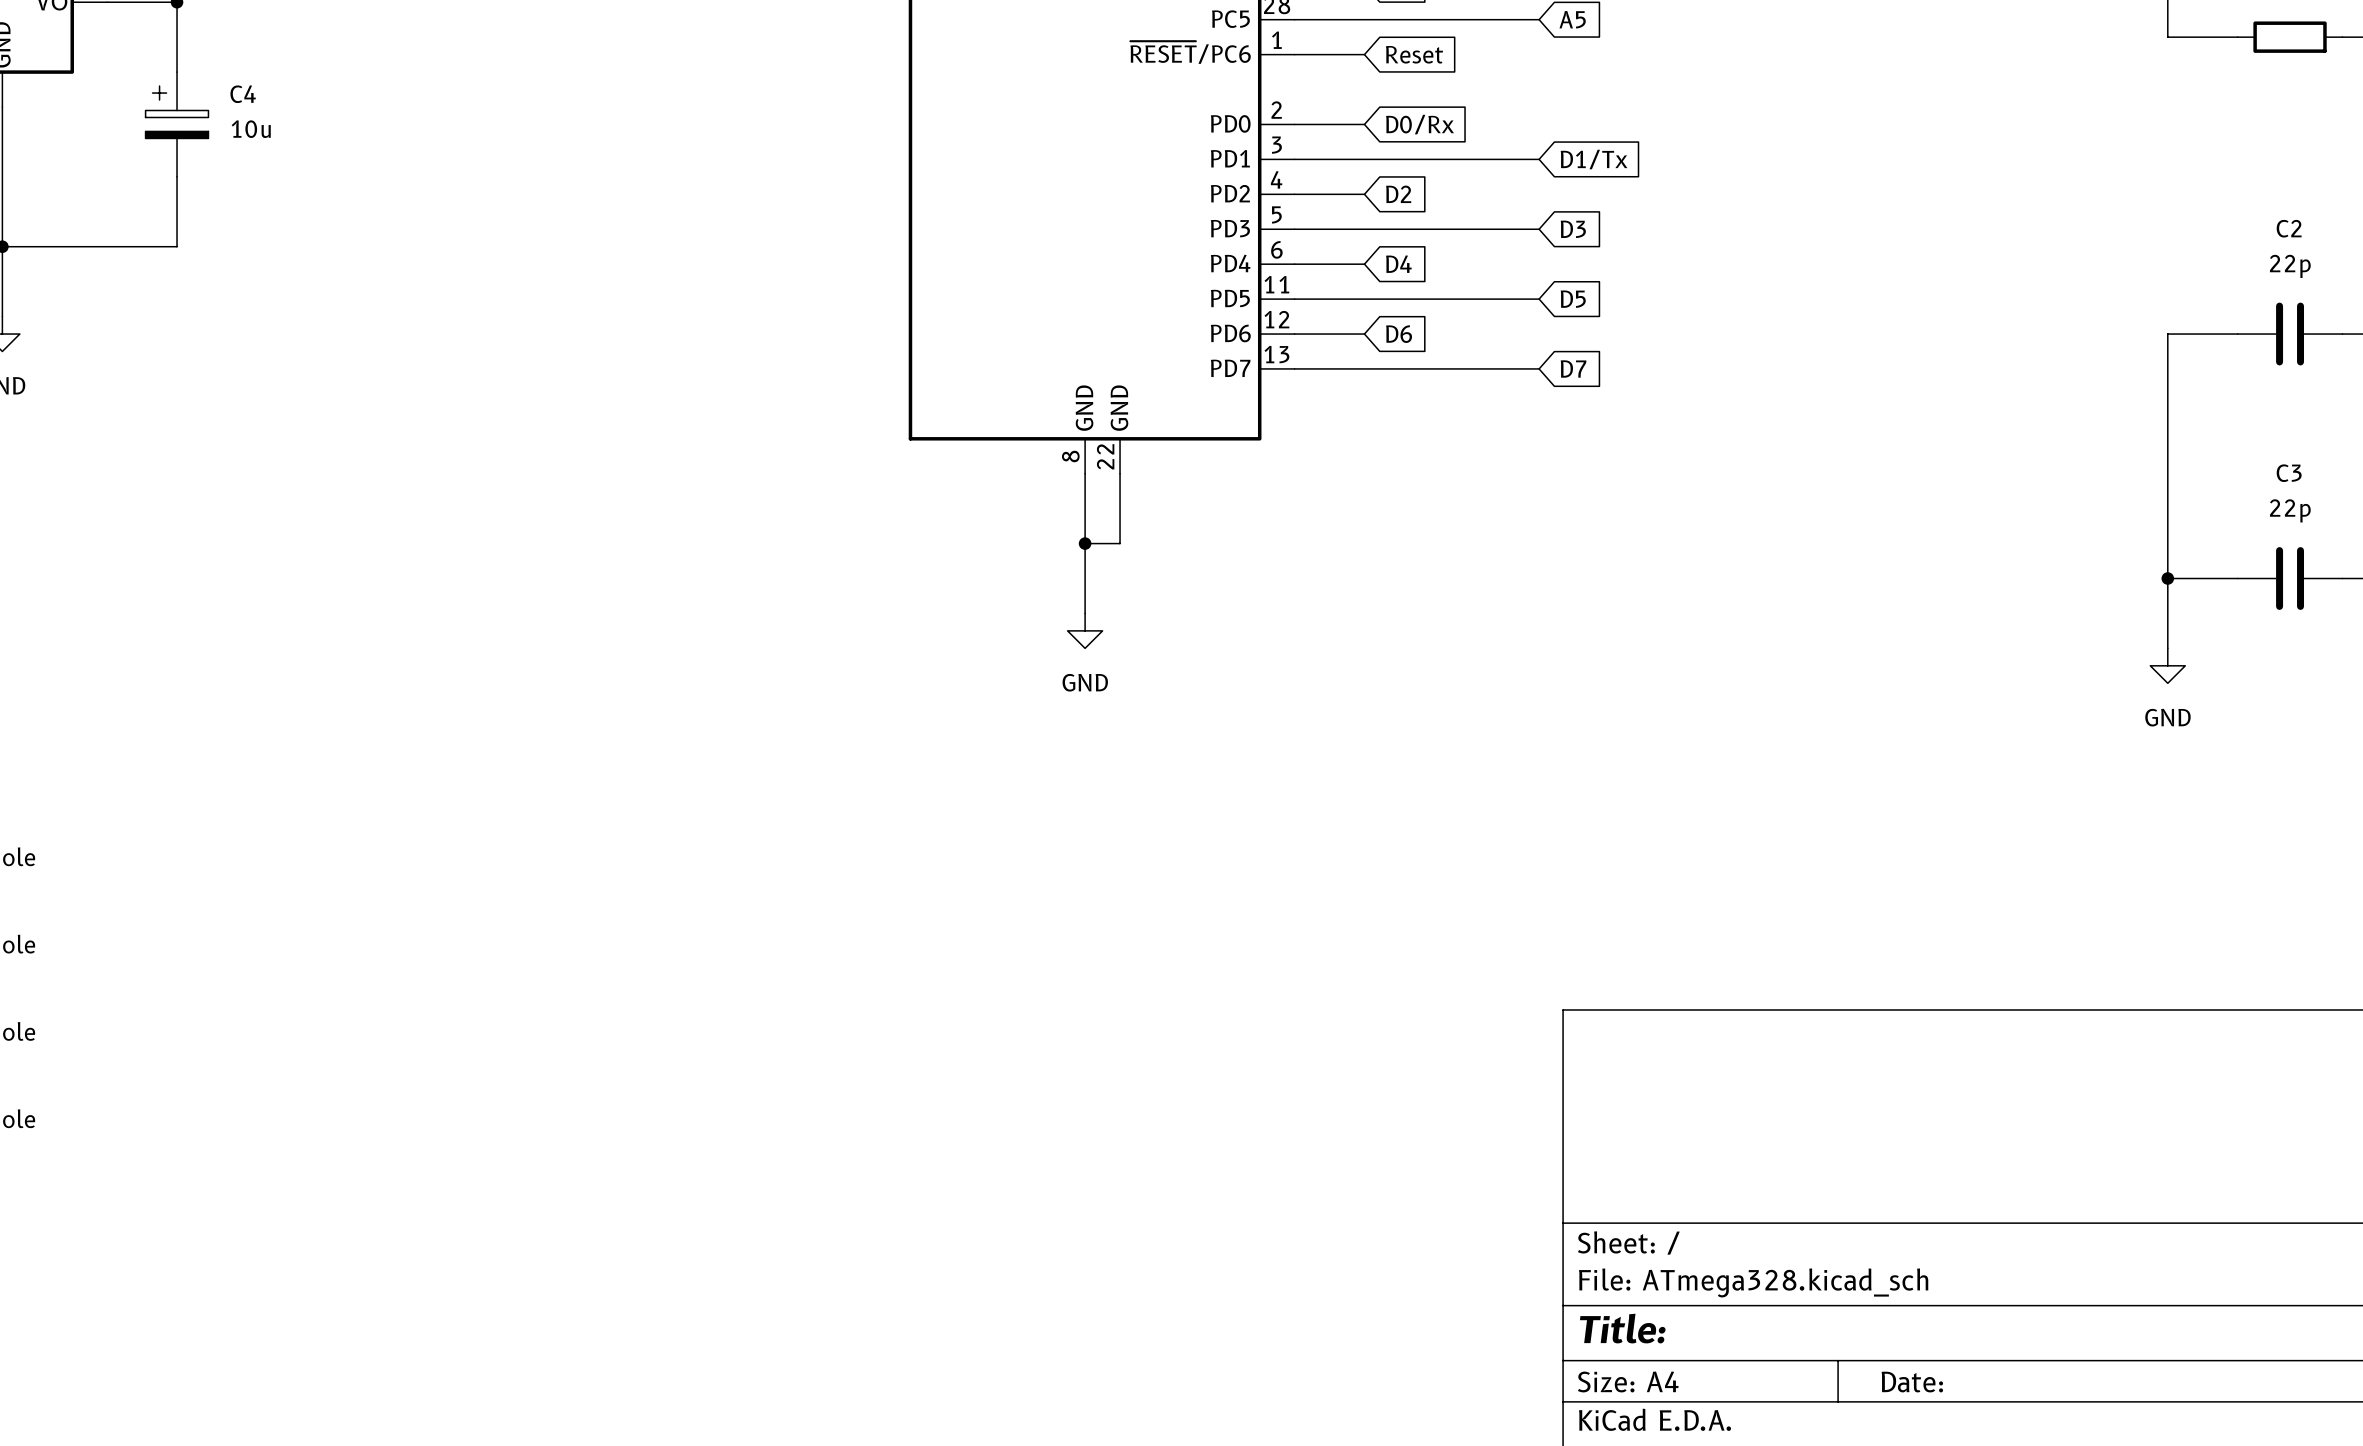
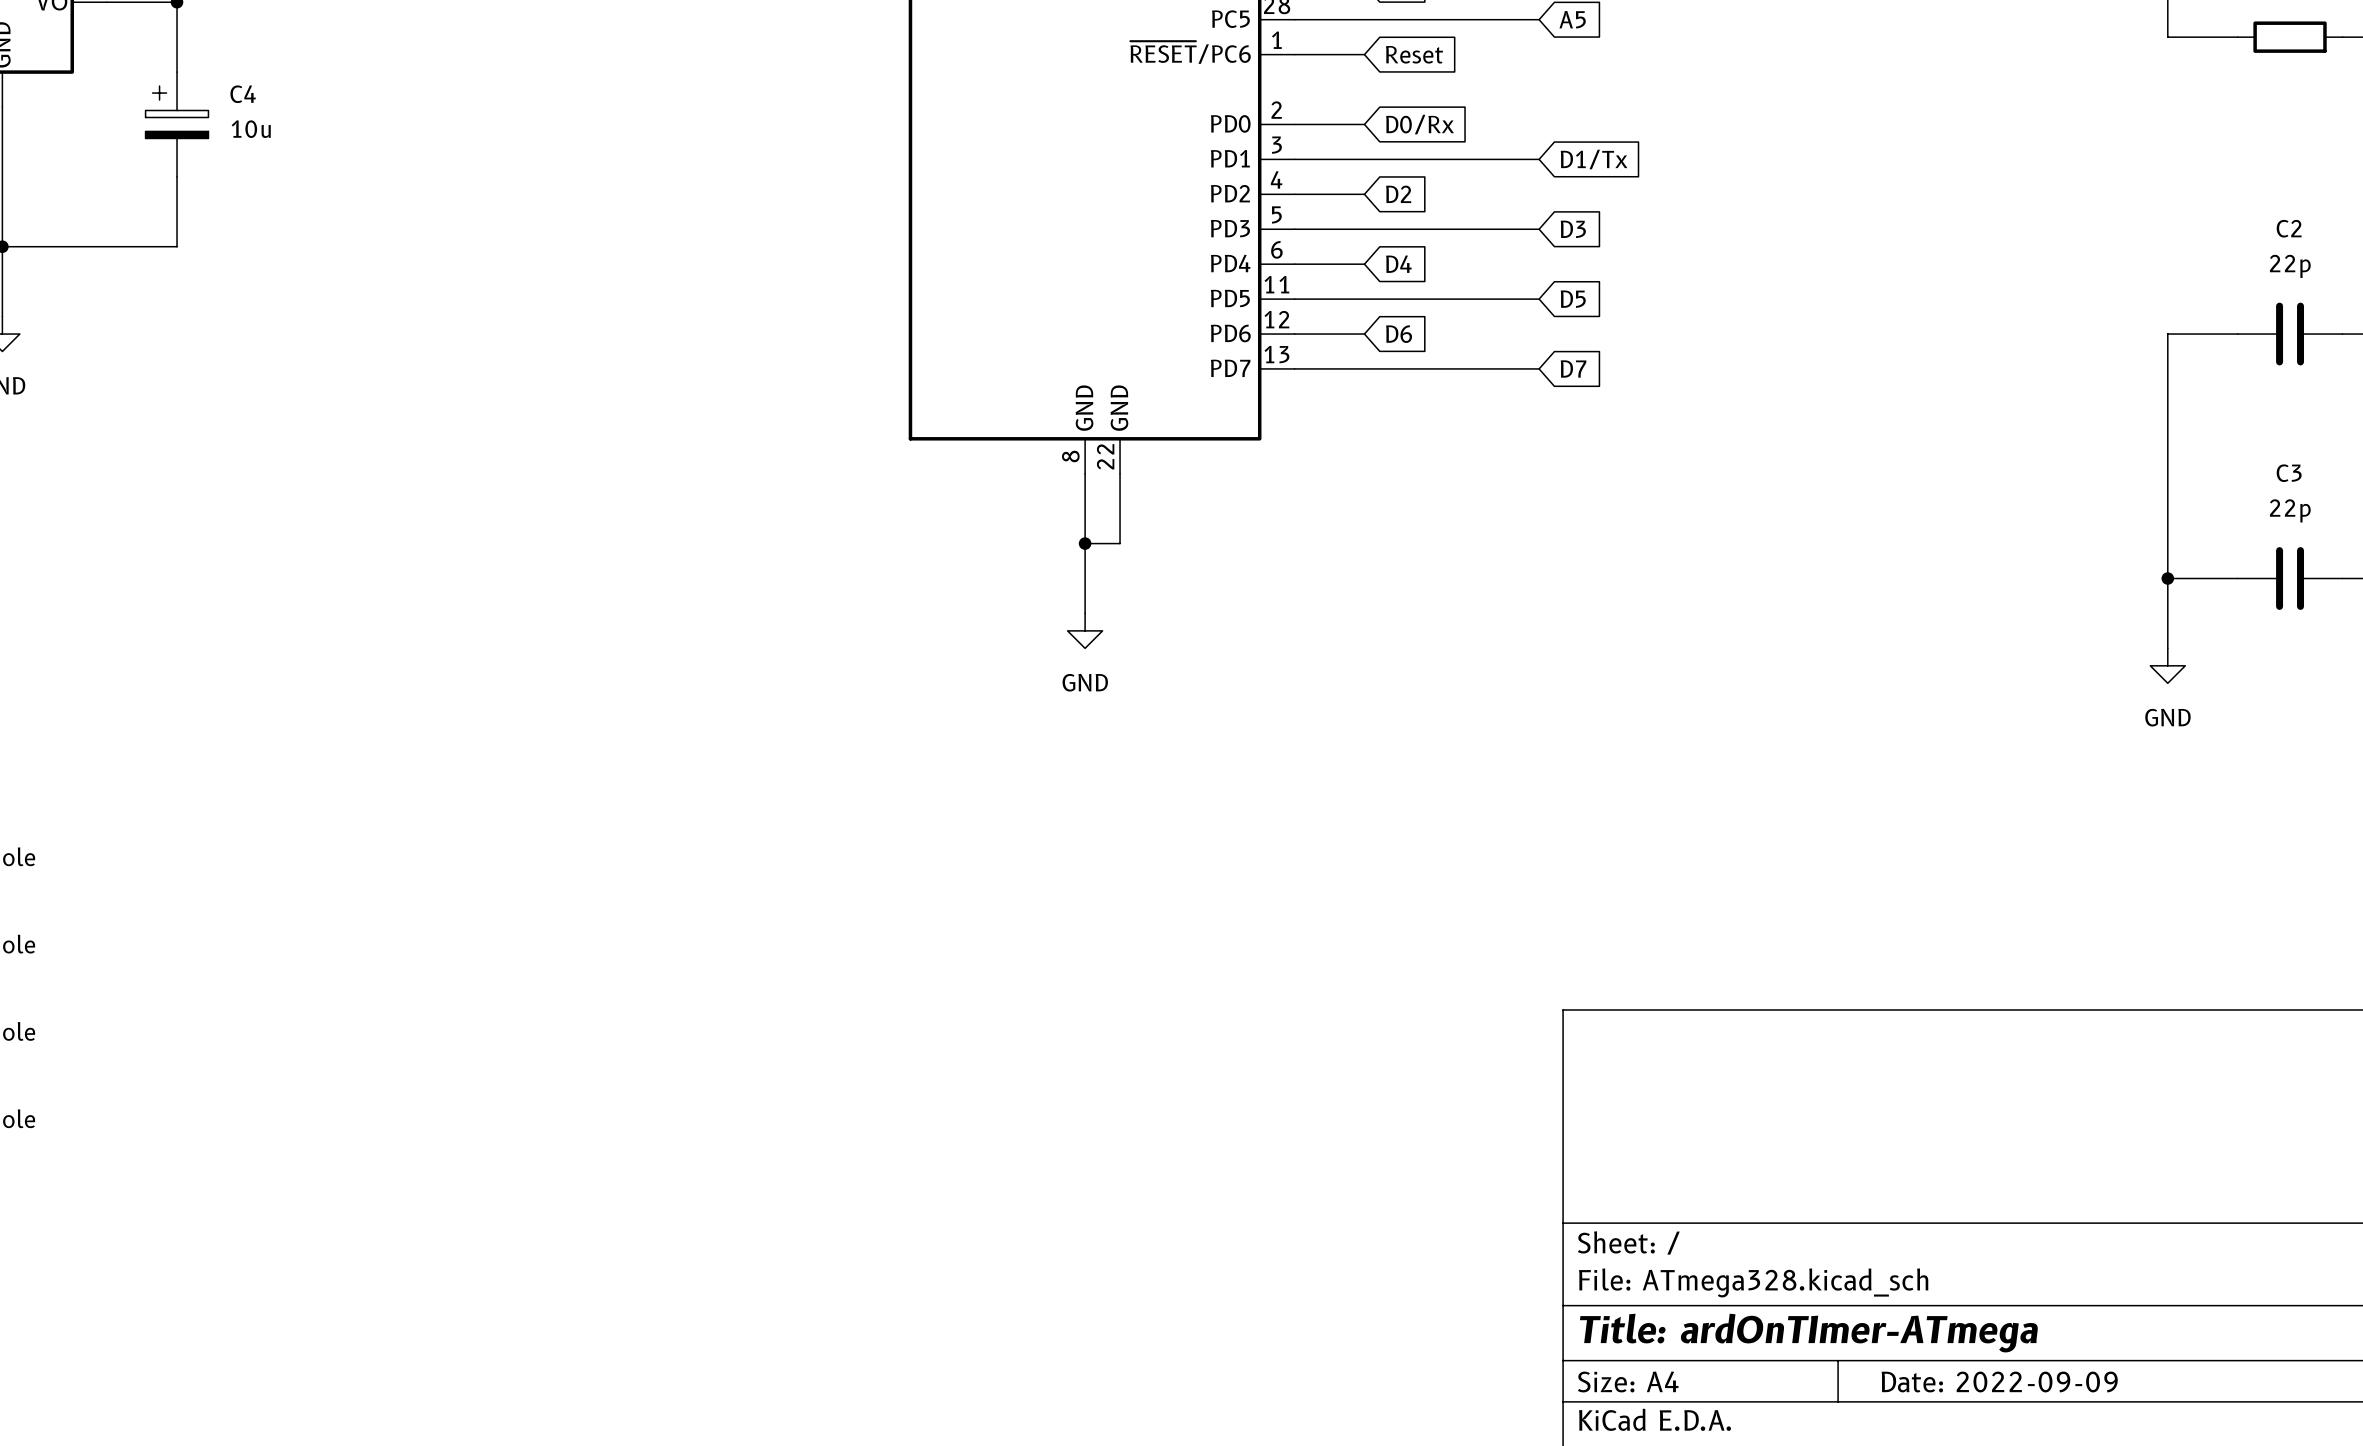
title block: Title: (1622, 1328) -> Title: ardOnTImer-ATmega (1808, 1333)
title block: Date: (1912, 1382) -> Date: 2022-09-09 (1999, 1381)

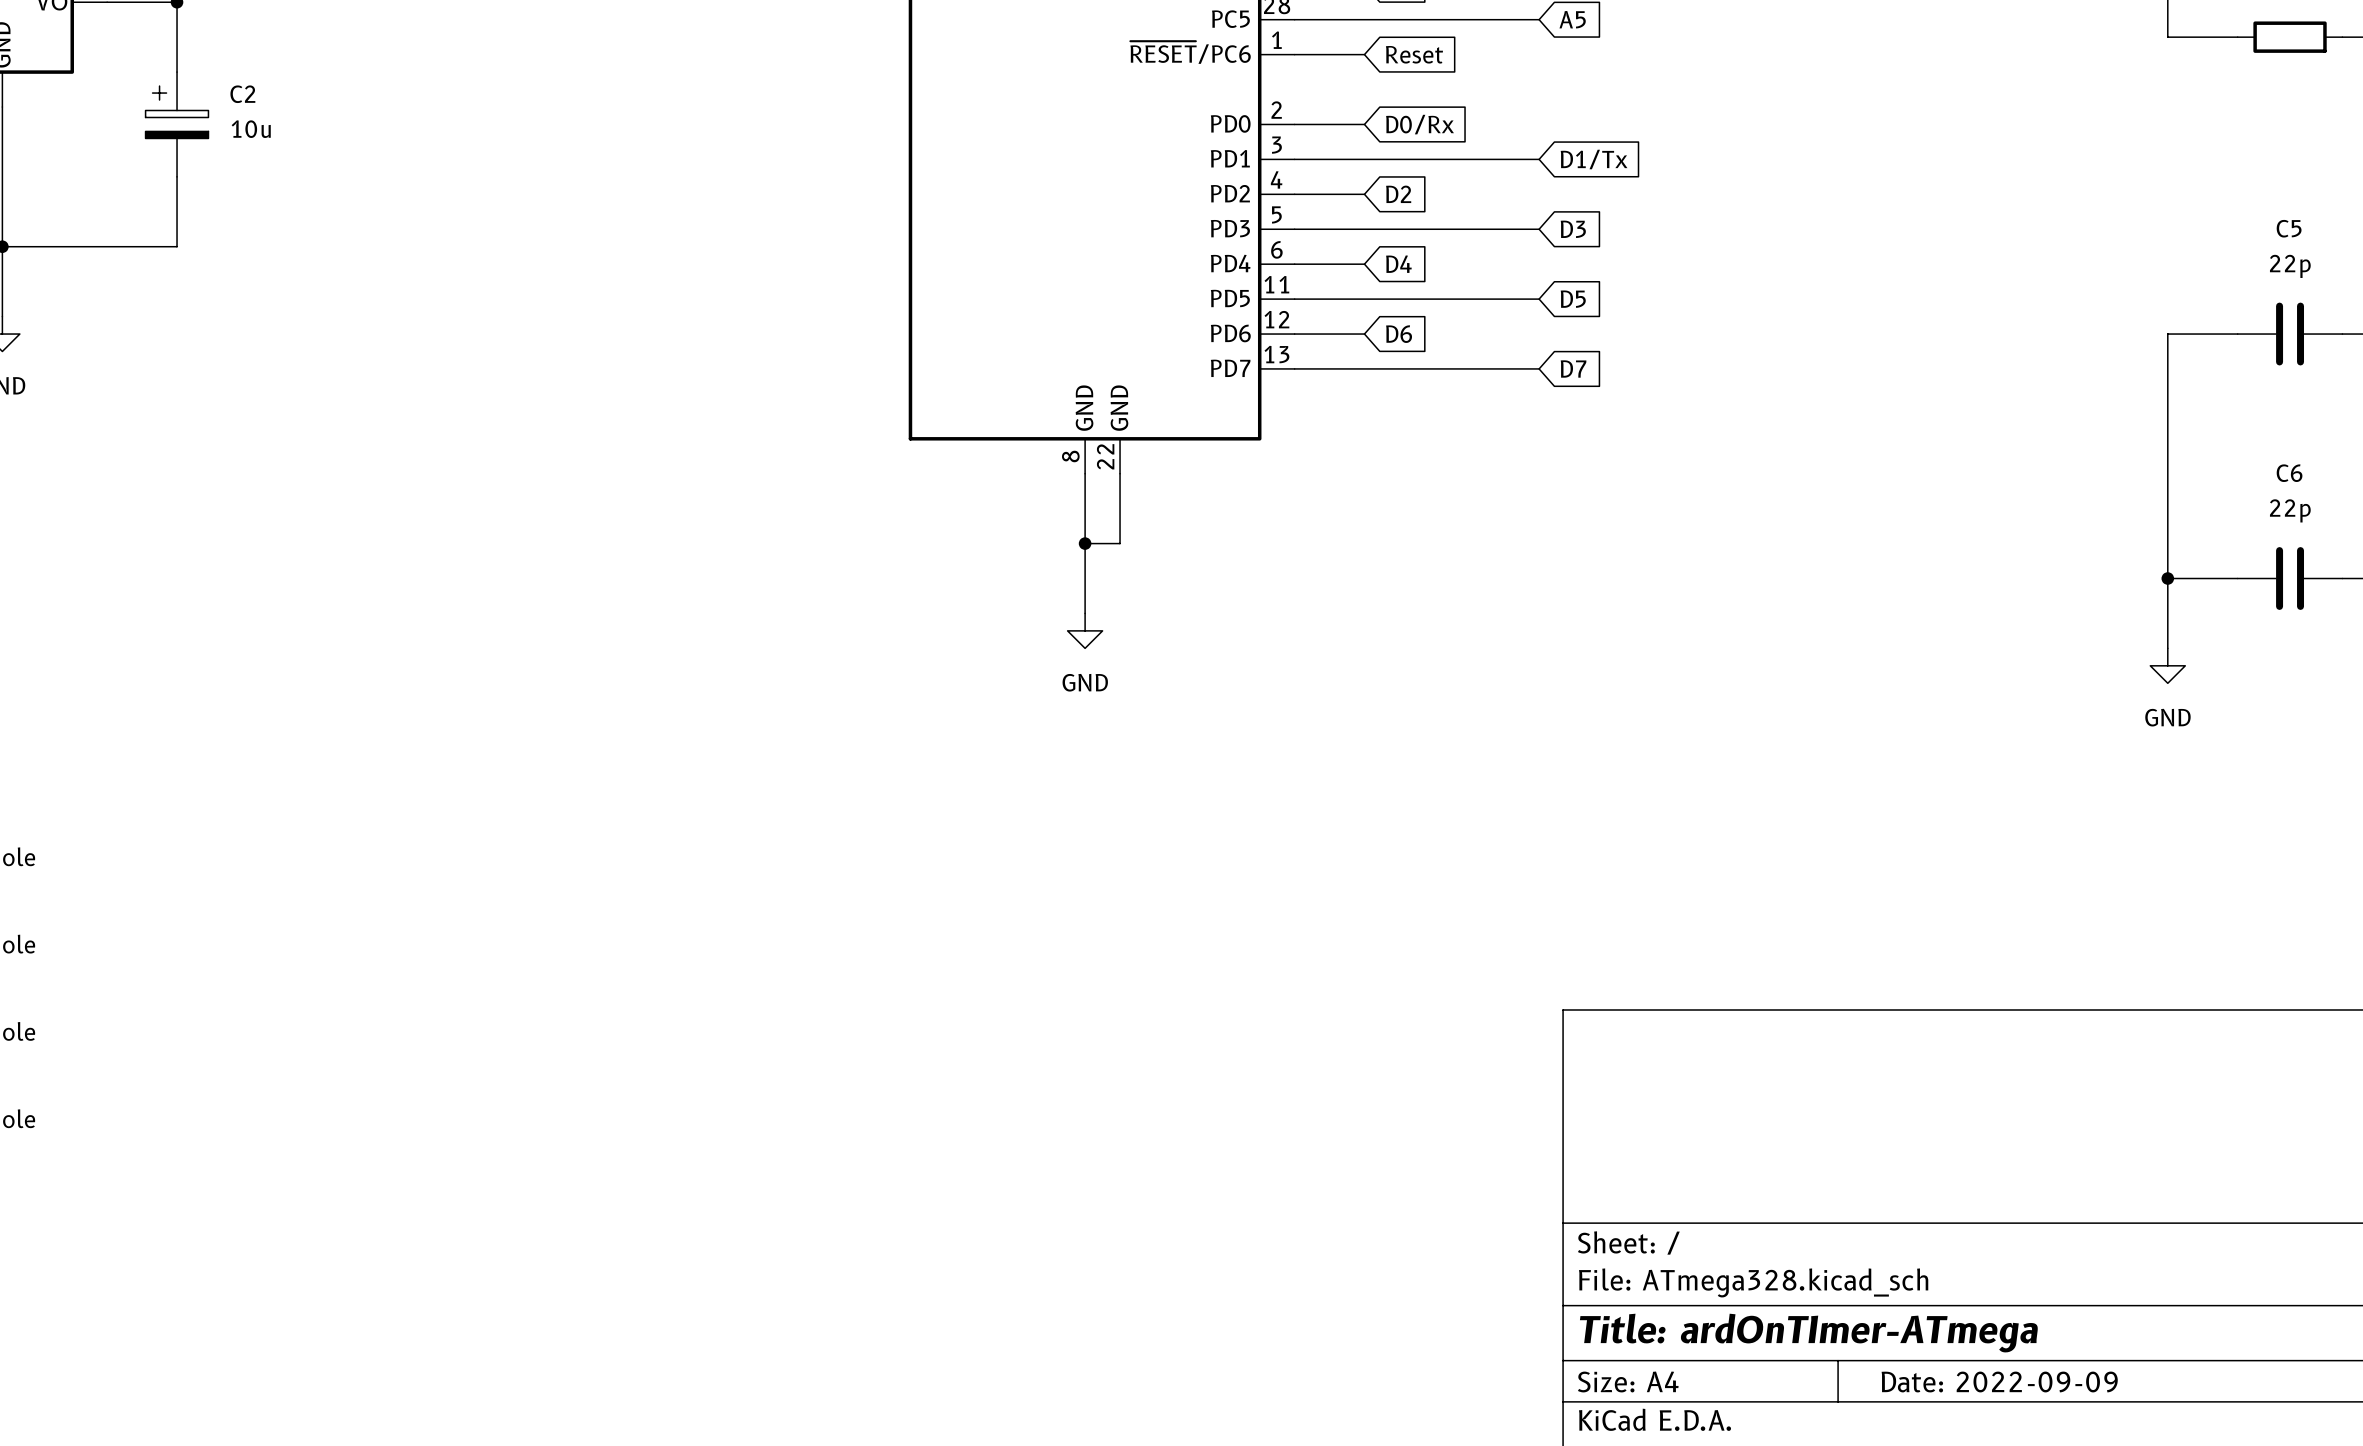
C4 name: C4 (243, 94) -> C2 (242, 94)
C2 name: C2 (2289, 228) -> C5 (2289, 228)
C3 name: C3 (2289, 473) -> C6 (2289, 473)

